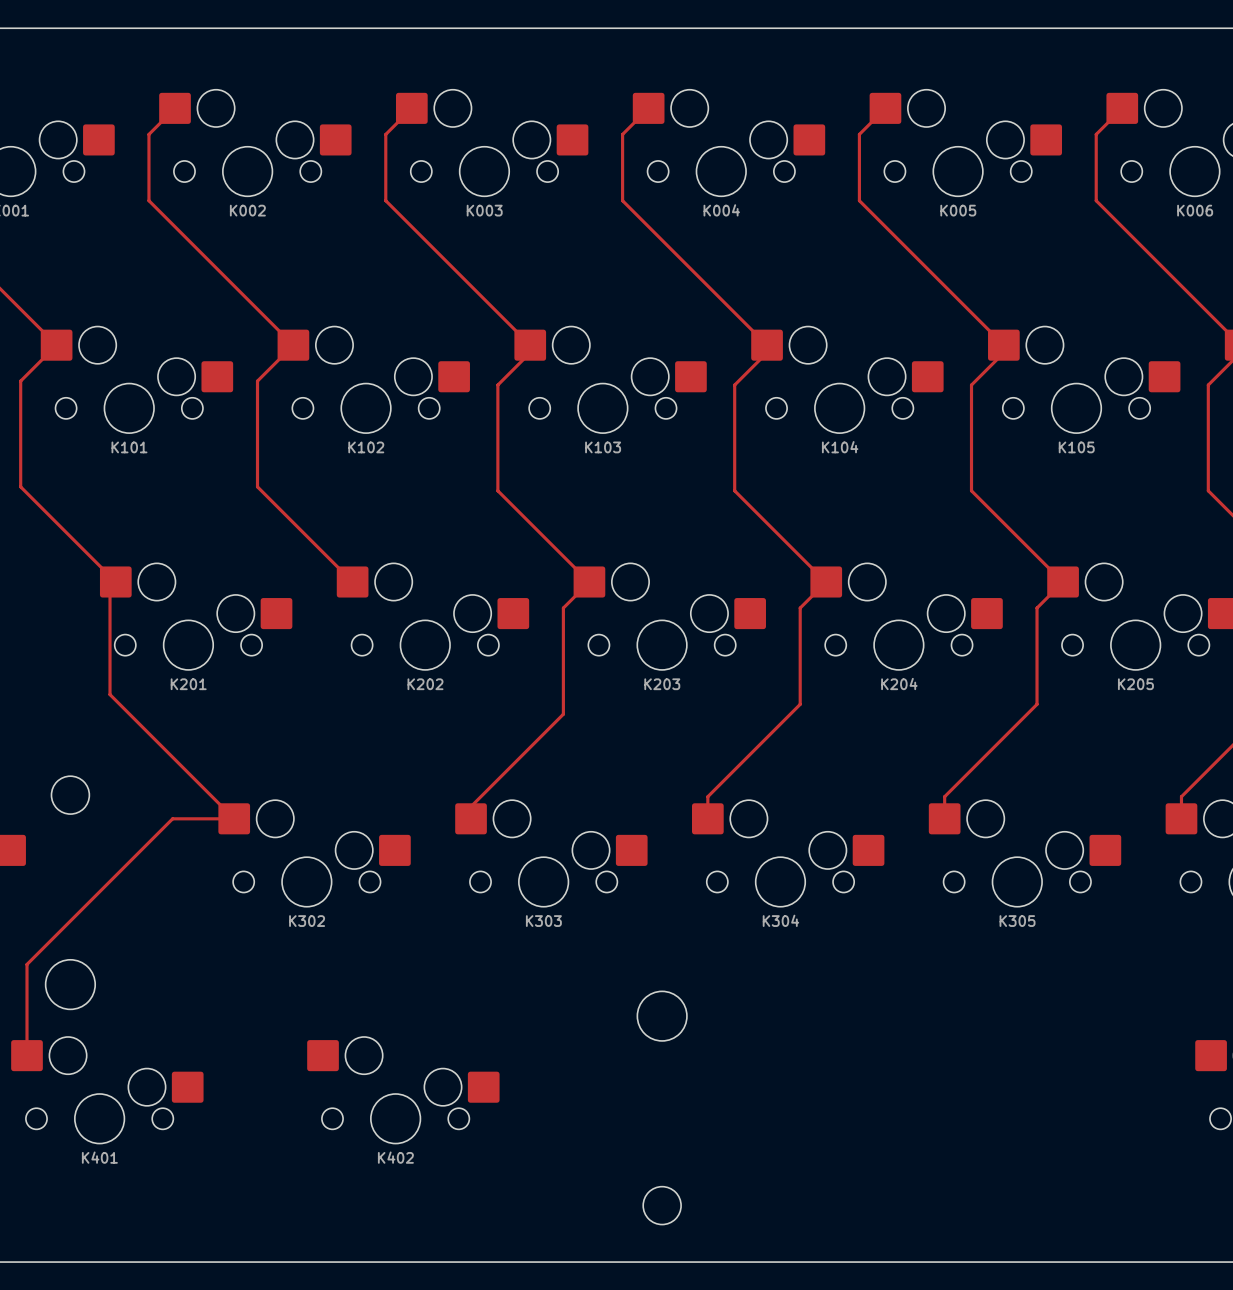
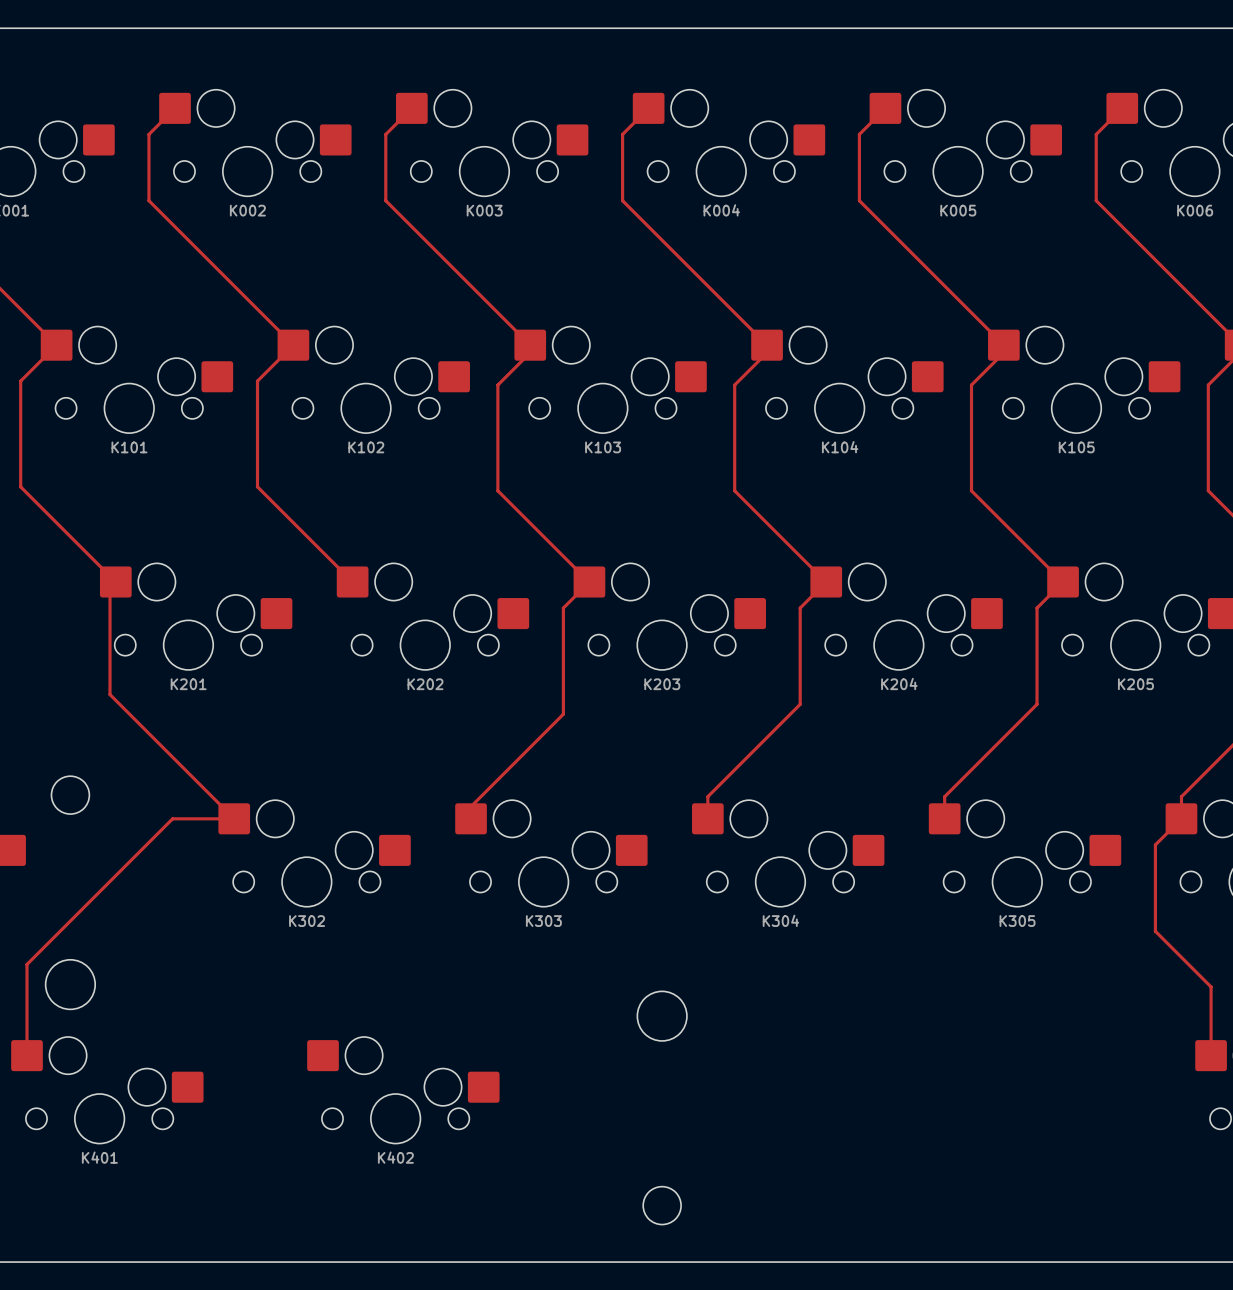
track: none -> (1181, 818) (1155, 844) (1155, 931) (1211, 986) (1211, 1055)

